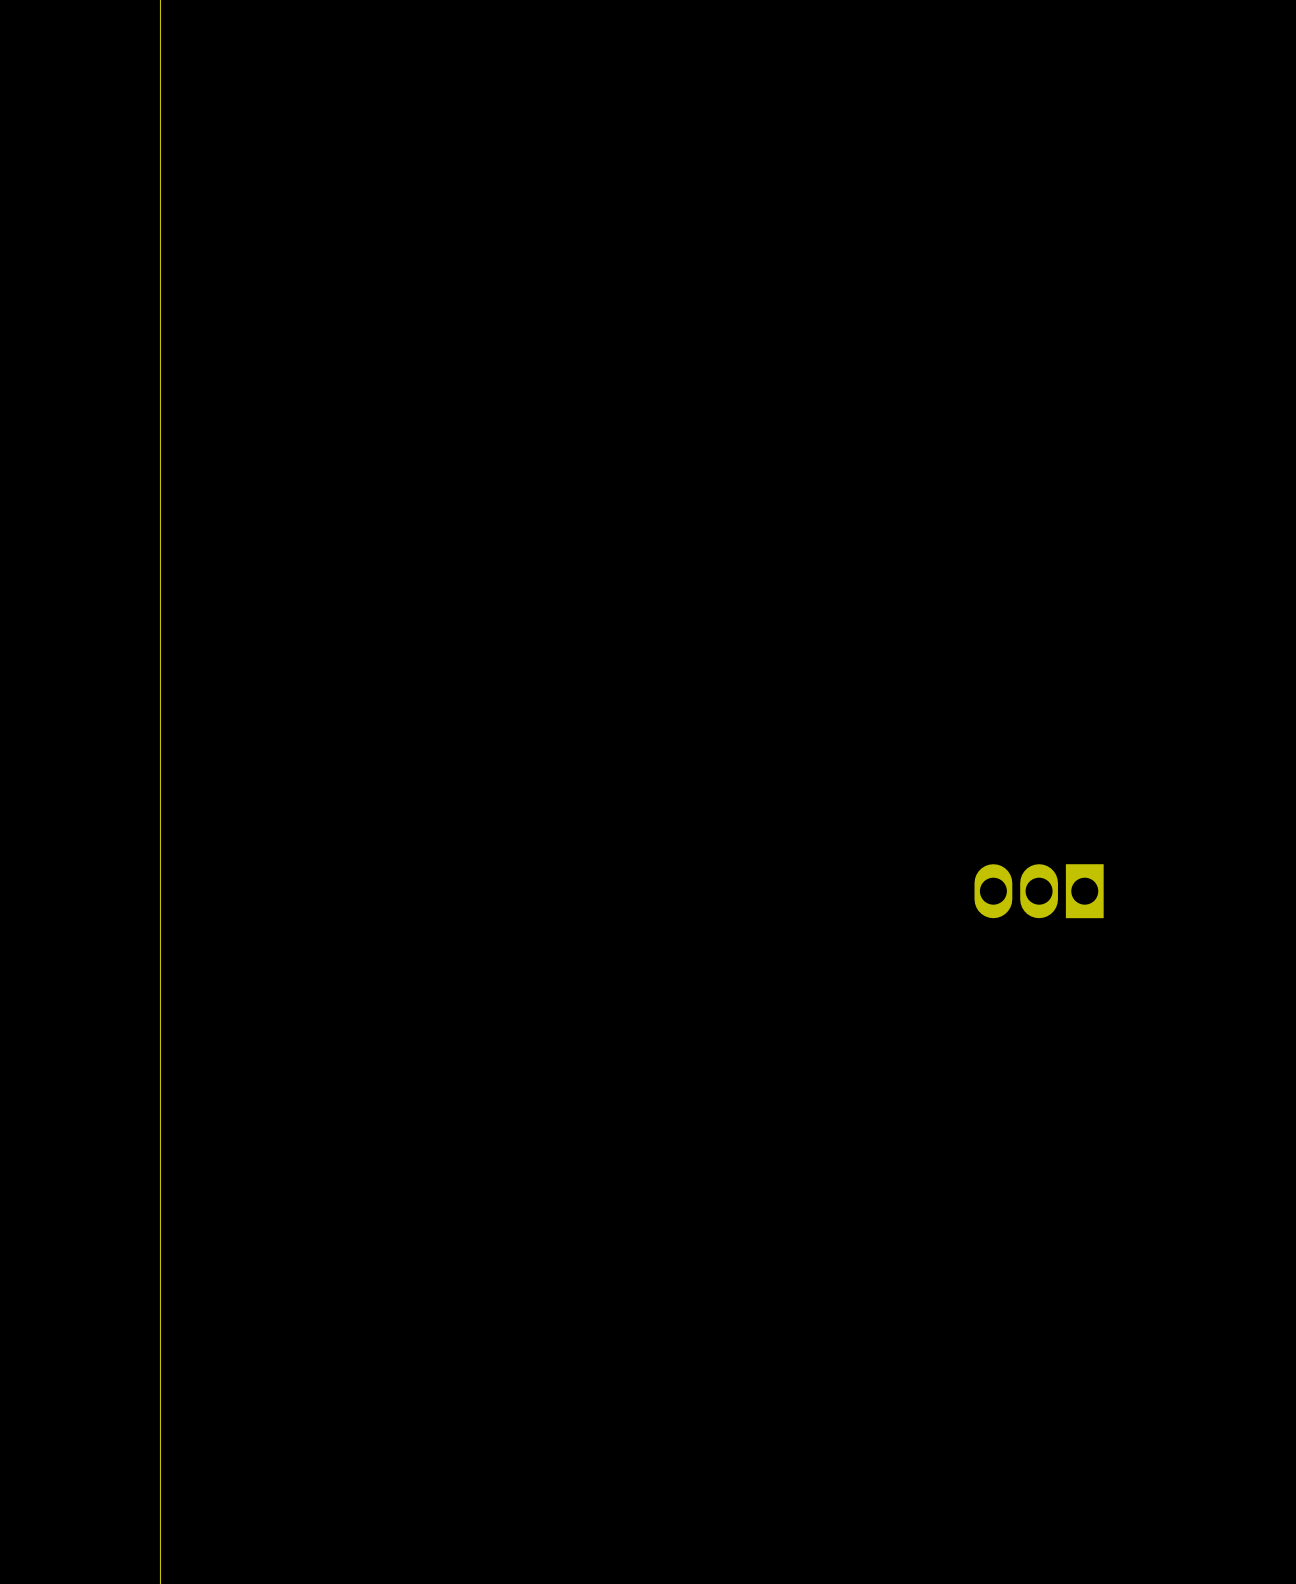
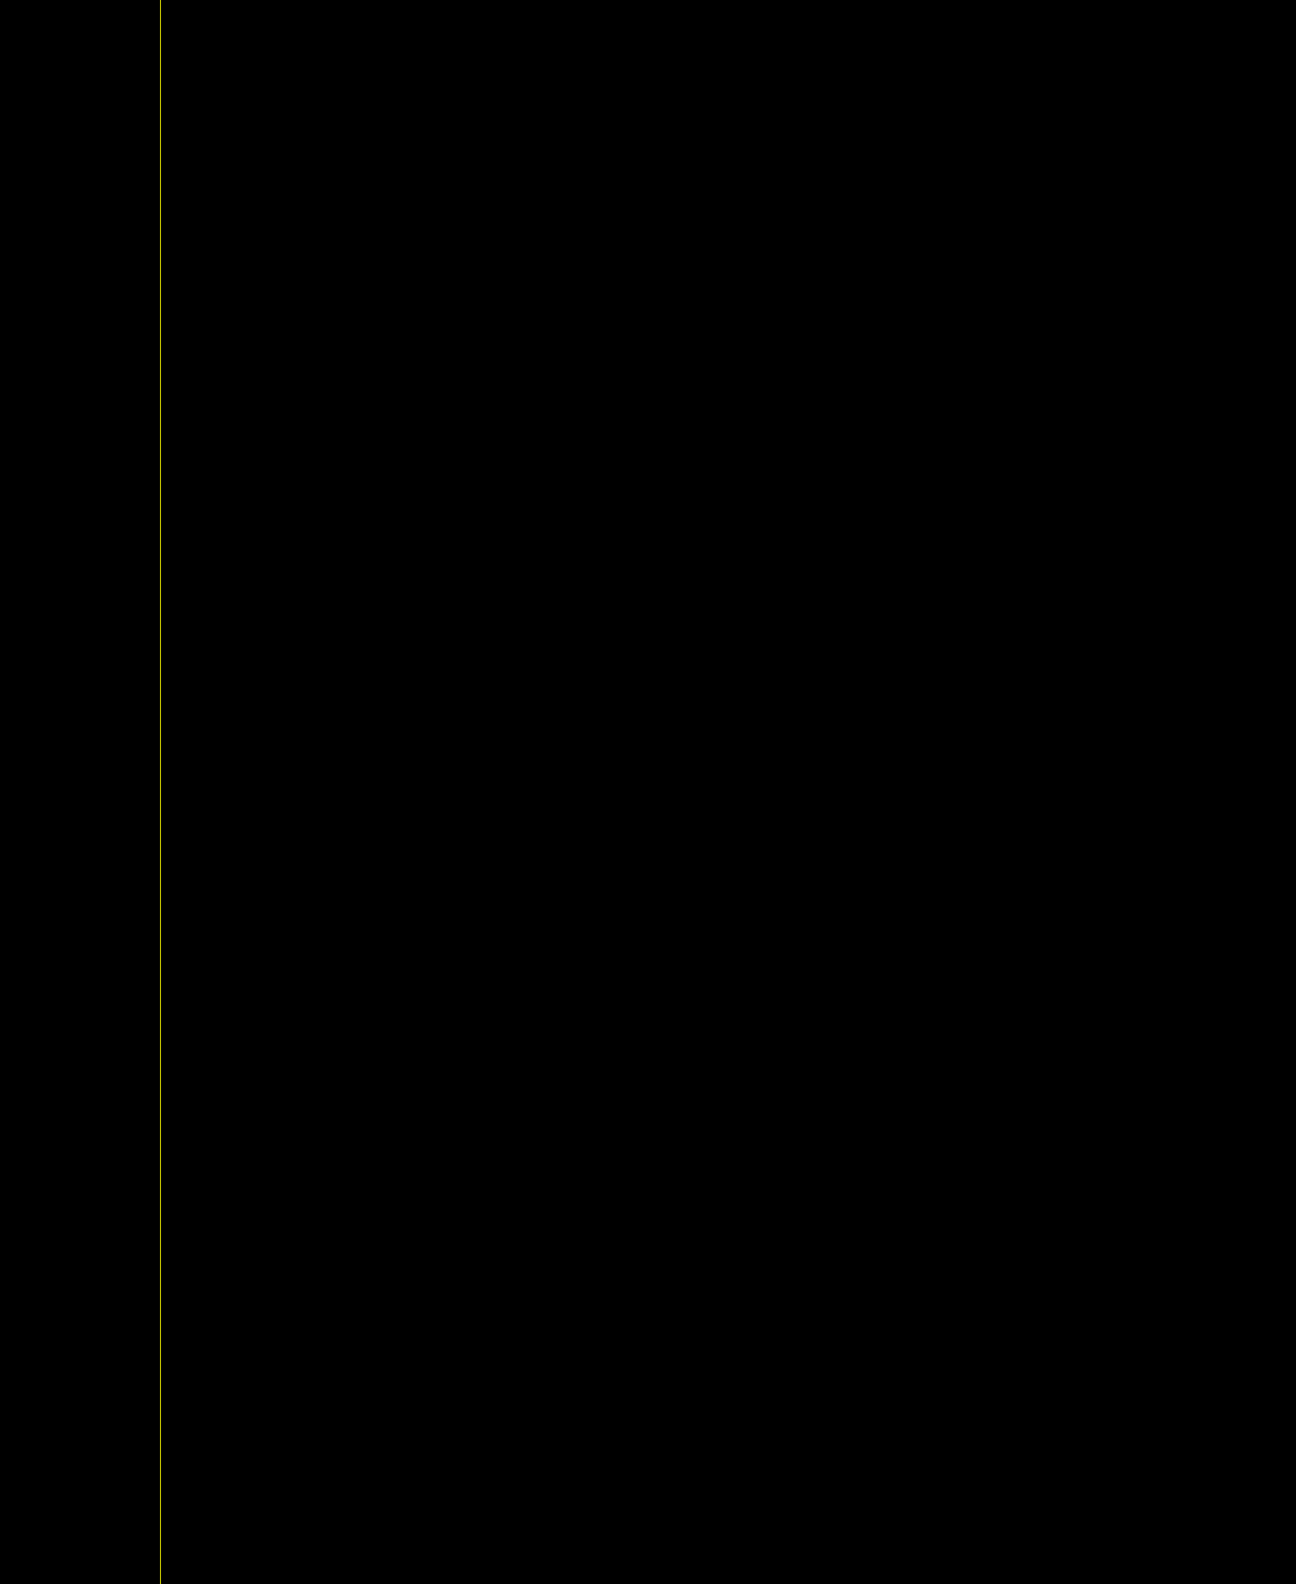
part: (1039, 891) -> none

